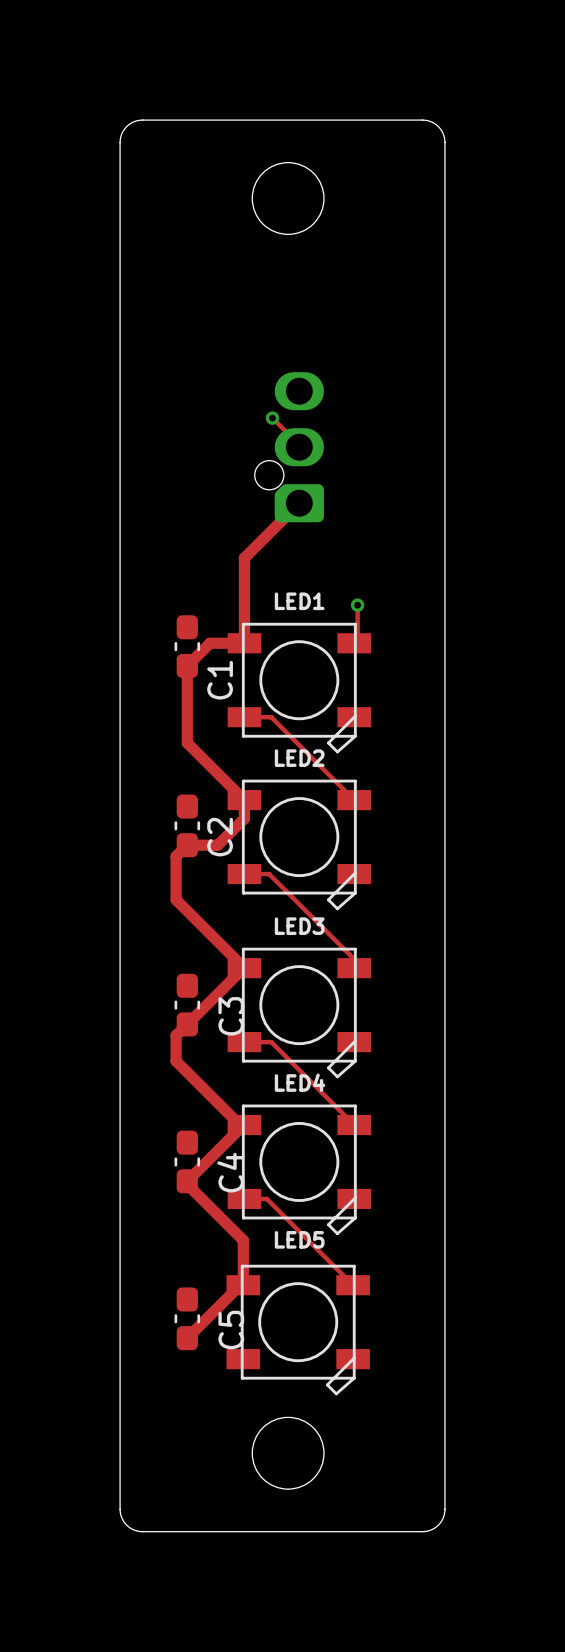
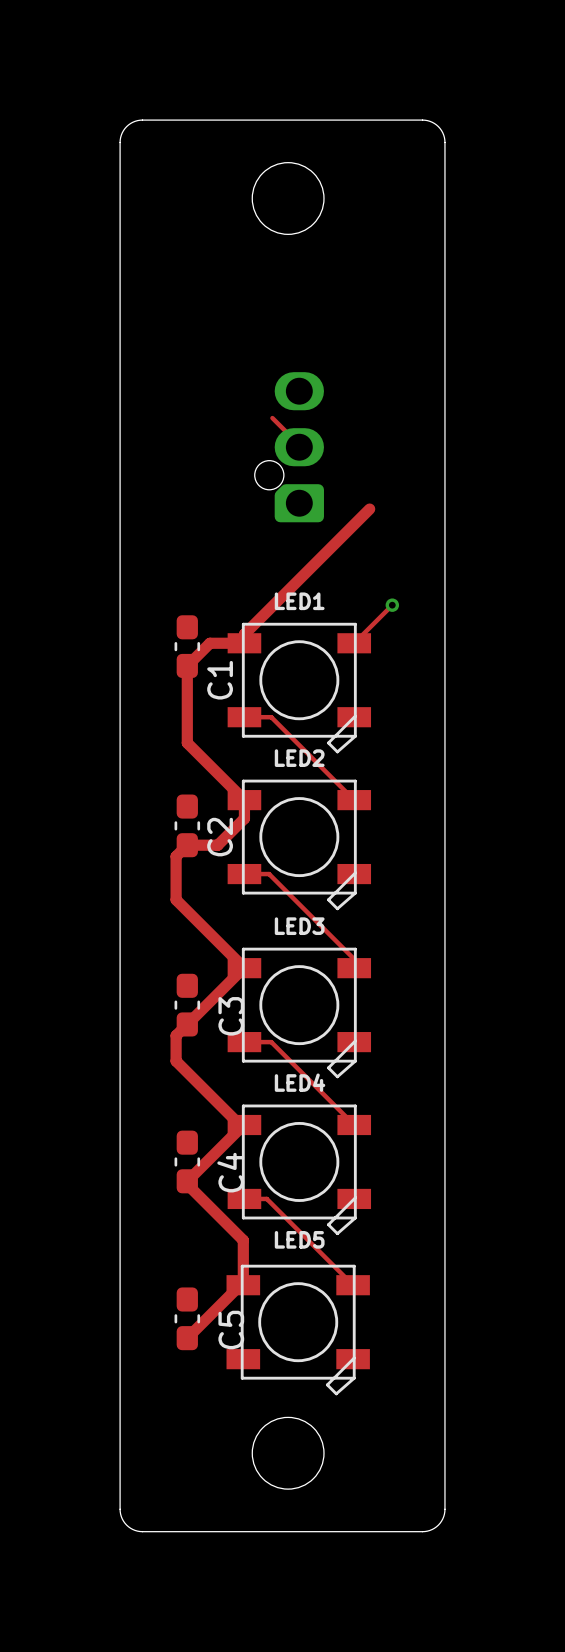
via: (272, 418) -> none
track: (299, 503) (244, 558) (244, 634) -> (369, 509) (244, 634)
track: (357, 605) (357, 639) -> (392, 605) (357, 639)
via position: (357, 605) -> (392, 605)

